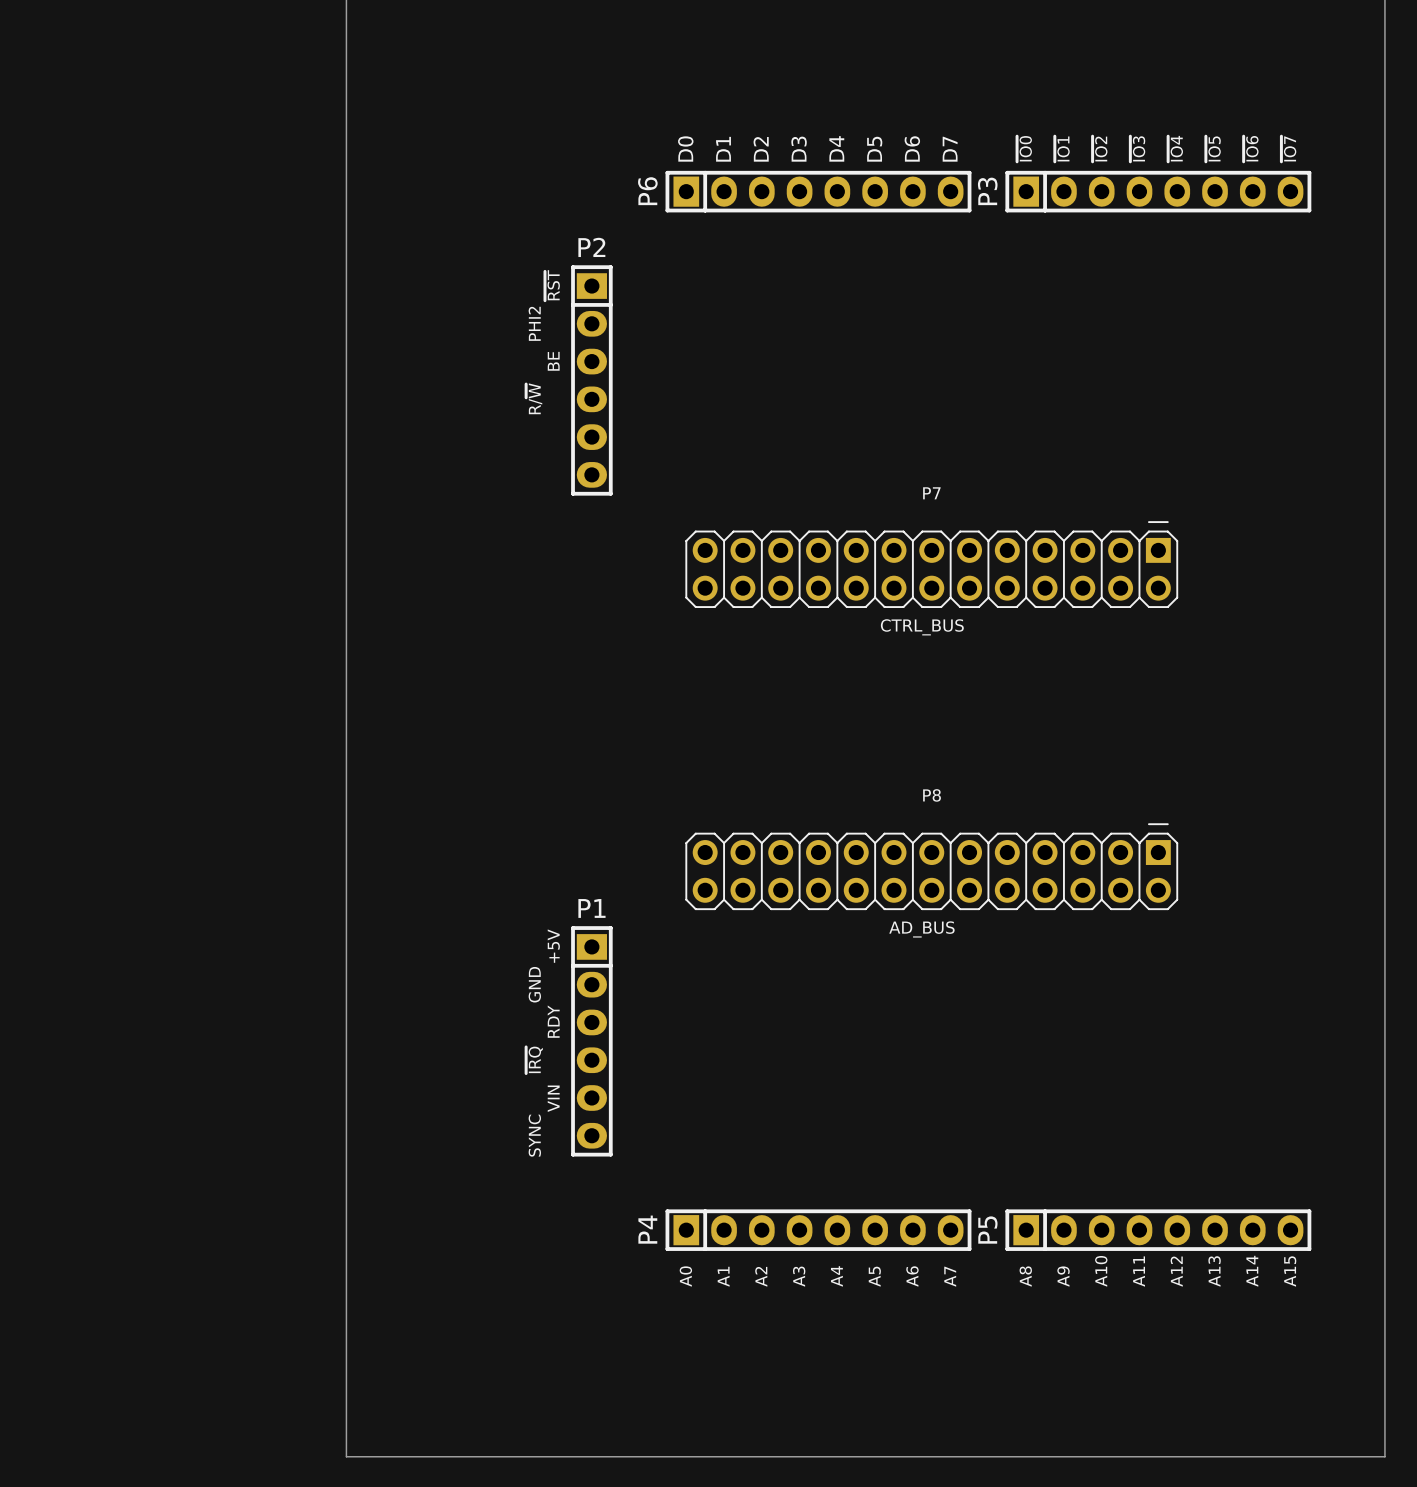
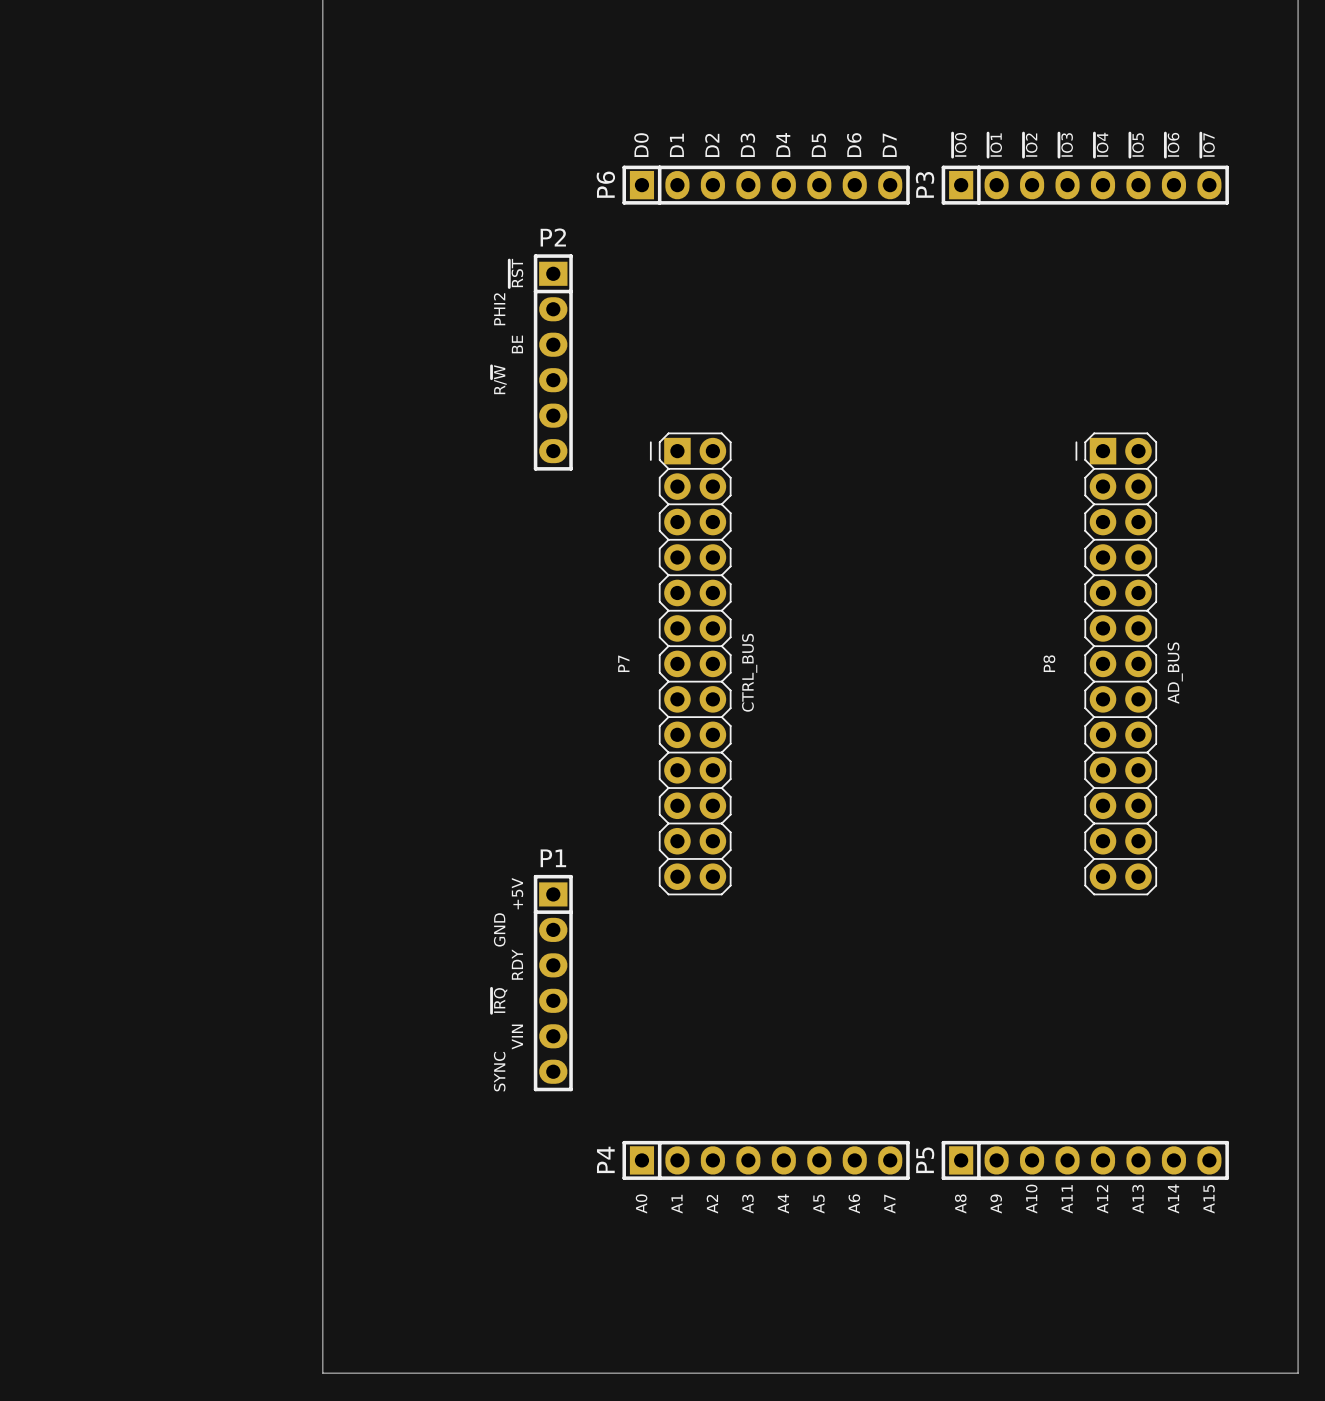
P7 name position: P7 (931, 493) -> P7 (623, 663)
P7 footprint: [685, 521, 1179, 608] -> [649, 432, 732, 896]
P7 value position: CTRL_BUS (922, 627) -> CTRL_BUS (749, 672)
P8 name position: P8 (932, 795) -> P8 (1049, 663)
P8 footprint: [685, 823, 1179, 911] -> [1075, 432, 1158, 896]
P8 value position: AD_BUS (921, 929) -> AD_BUS (1175, 673)

